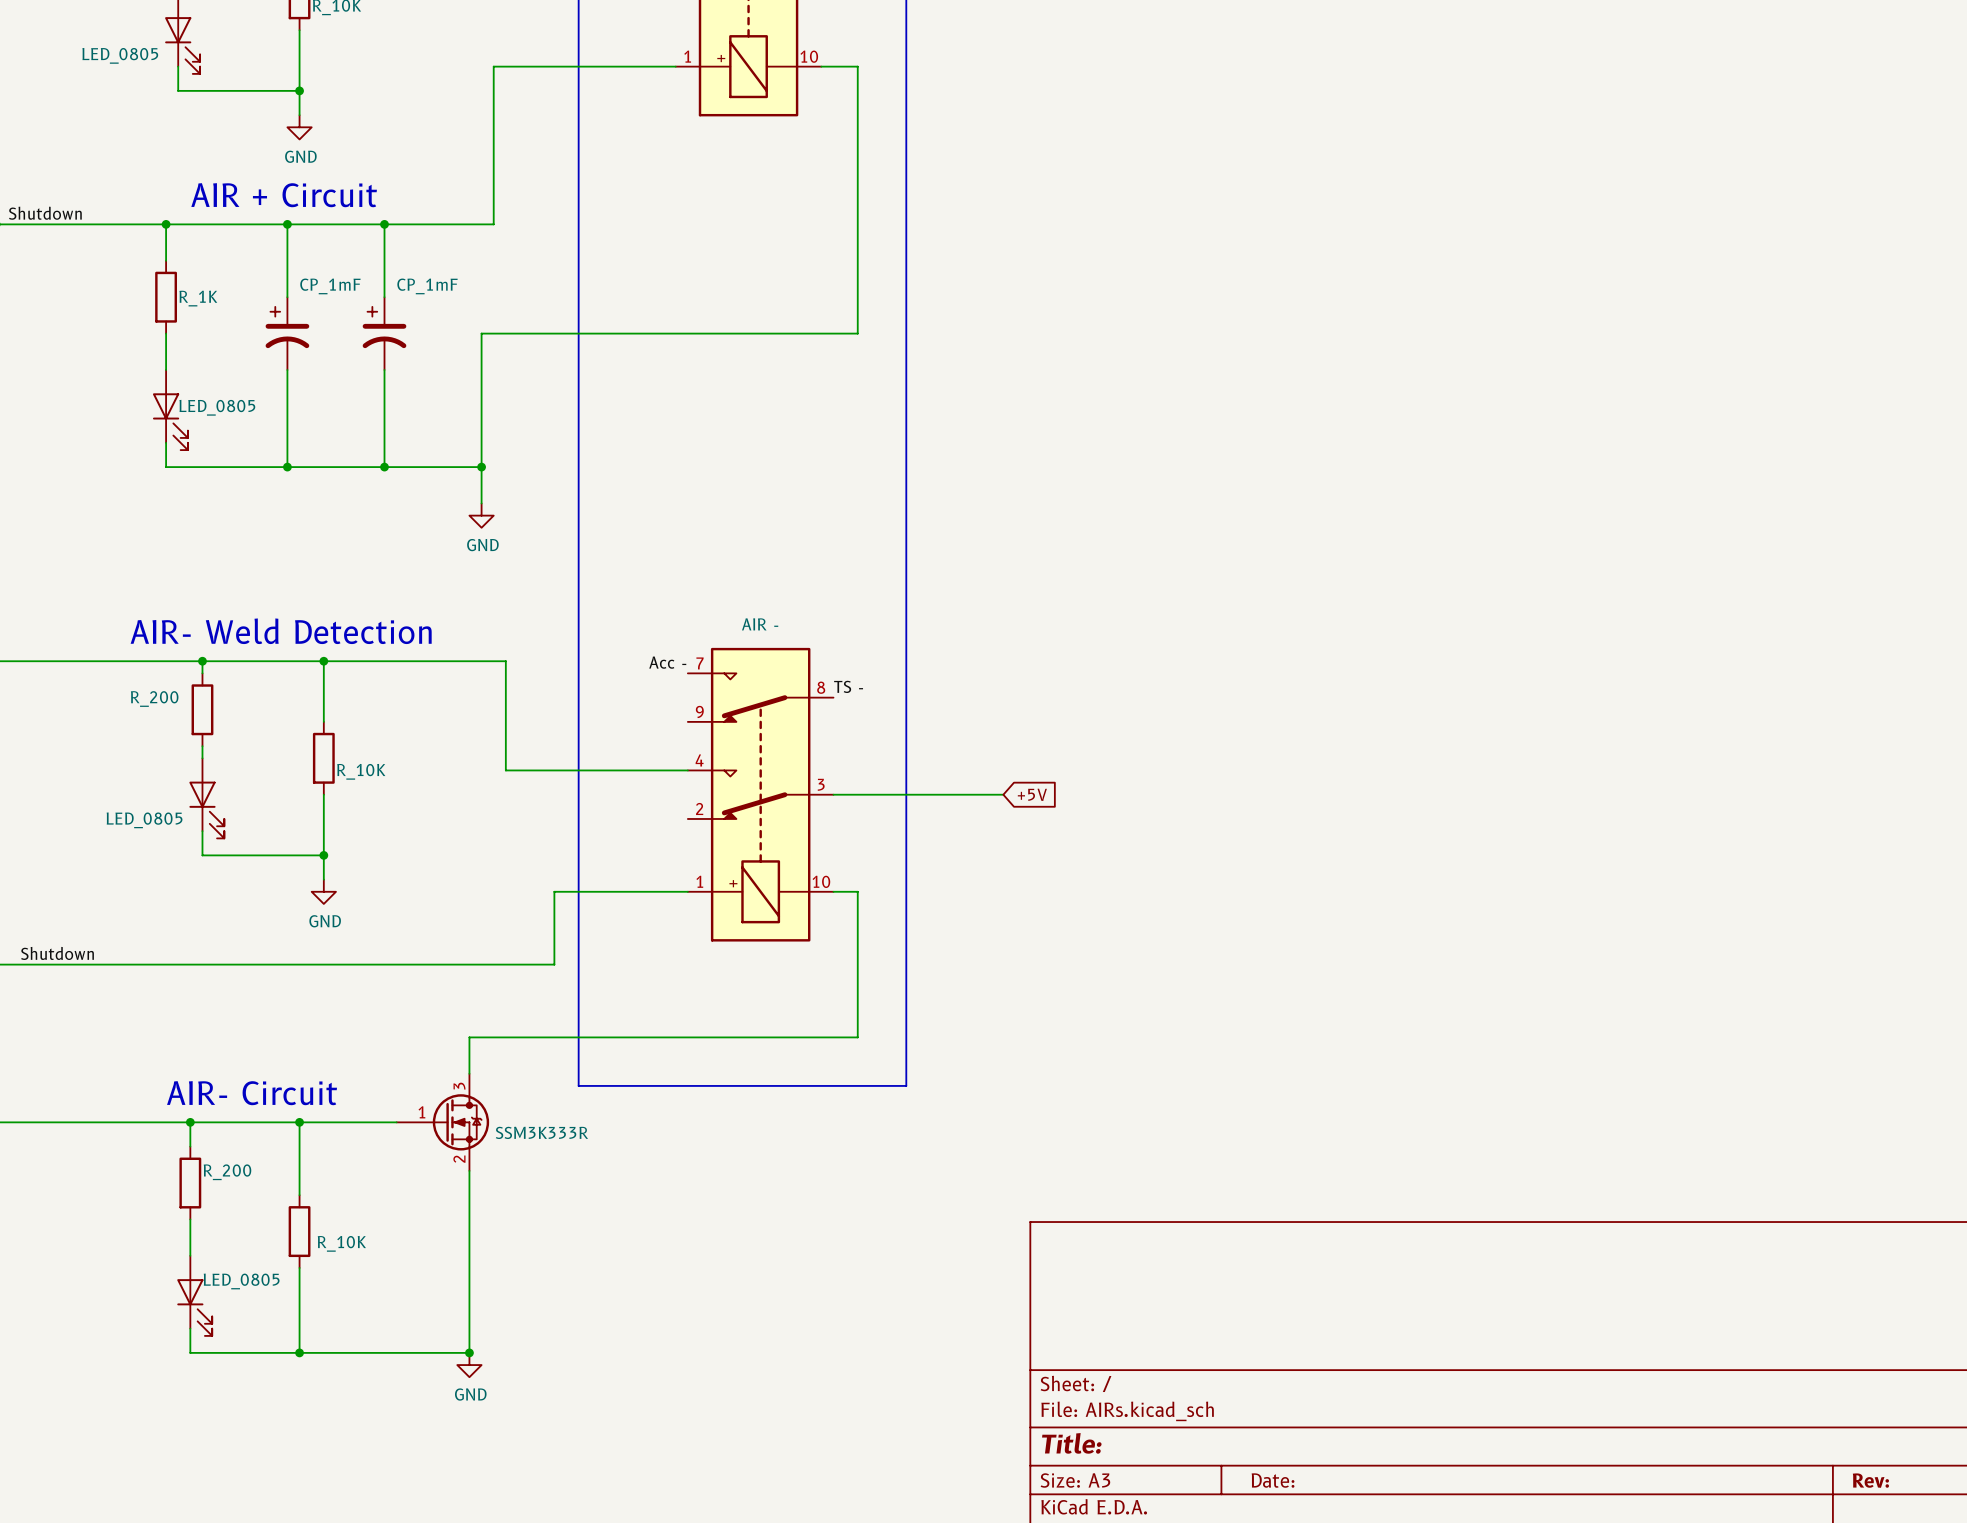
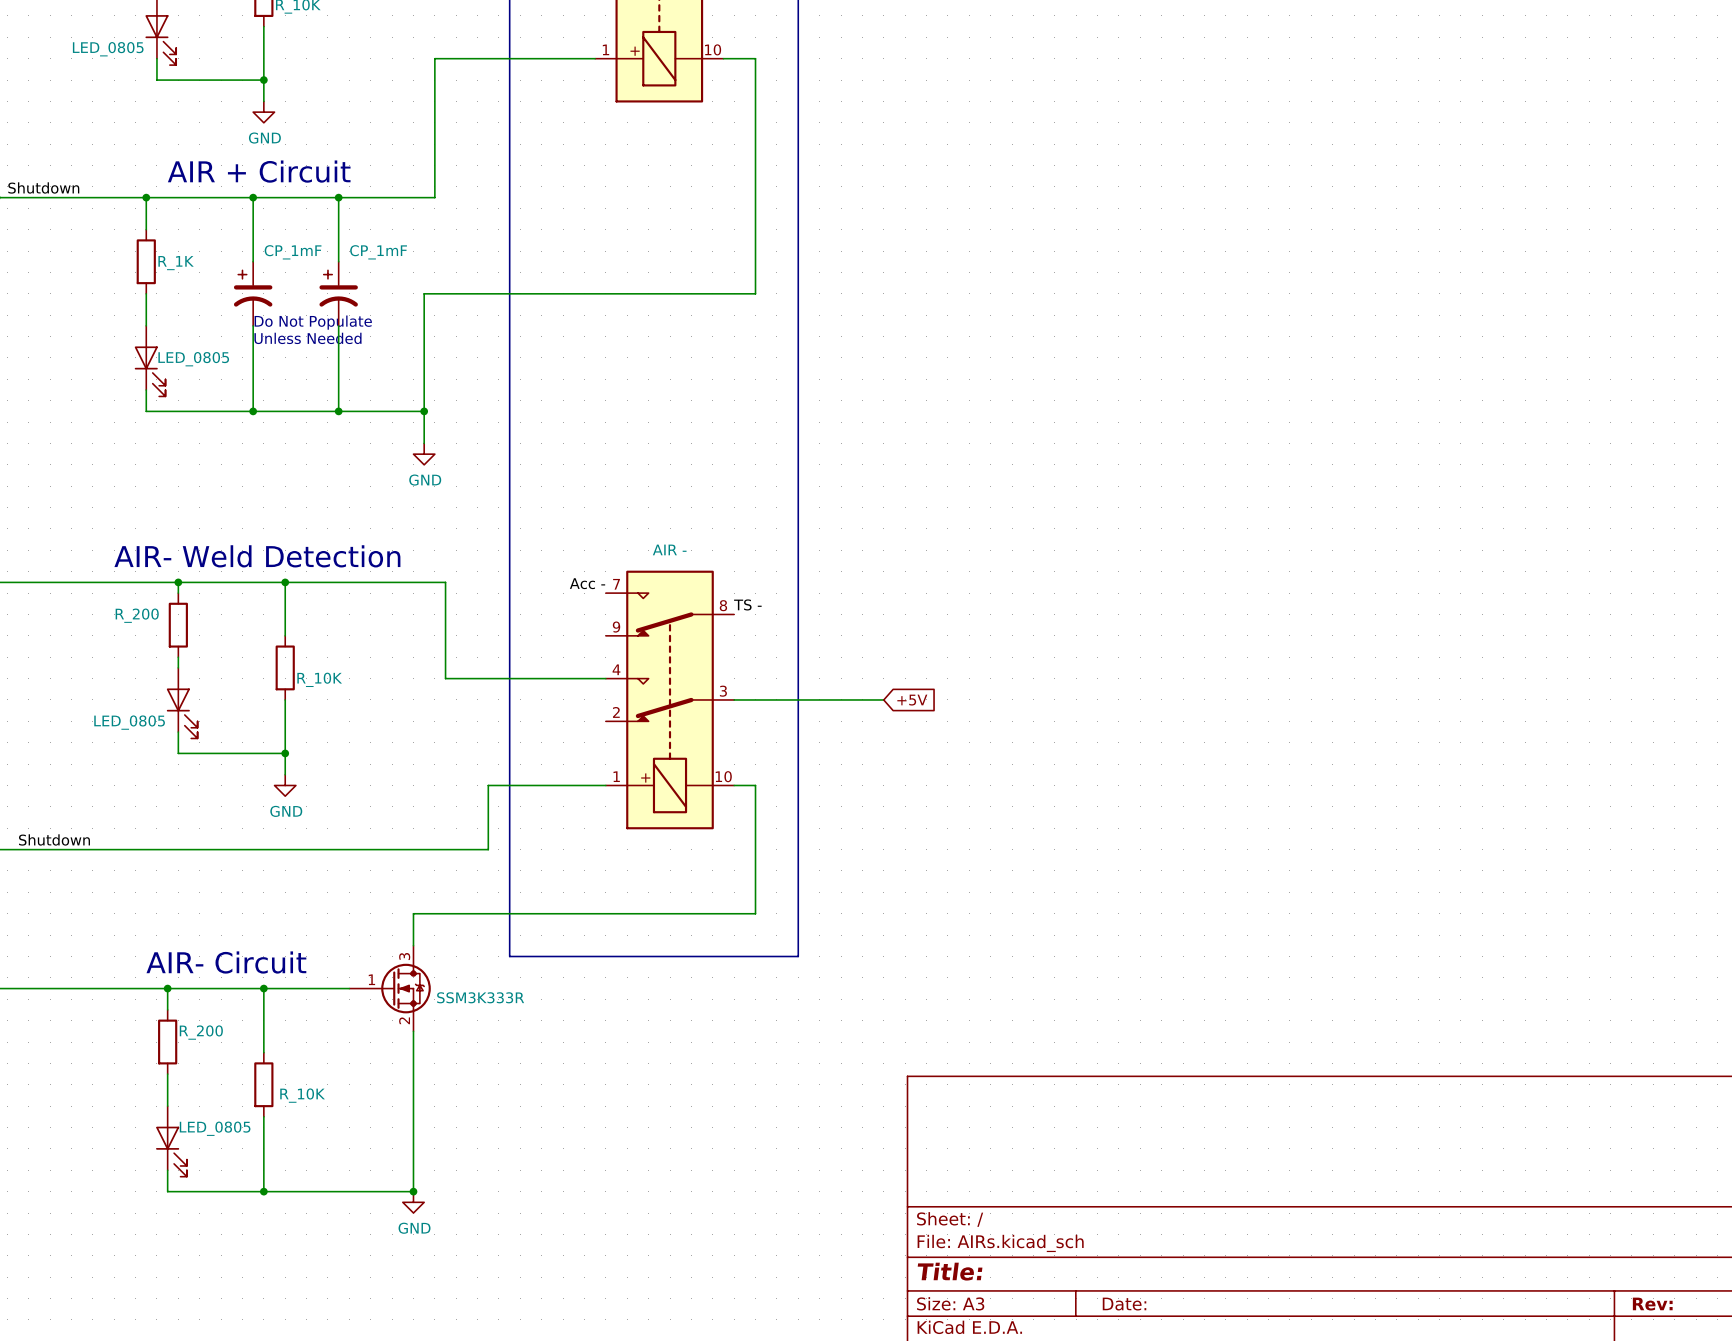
text: none -> Do Not Populate (313, 322)
text: none -> Unless Needed (307, 338)

